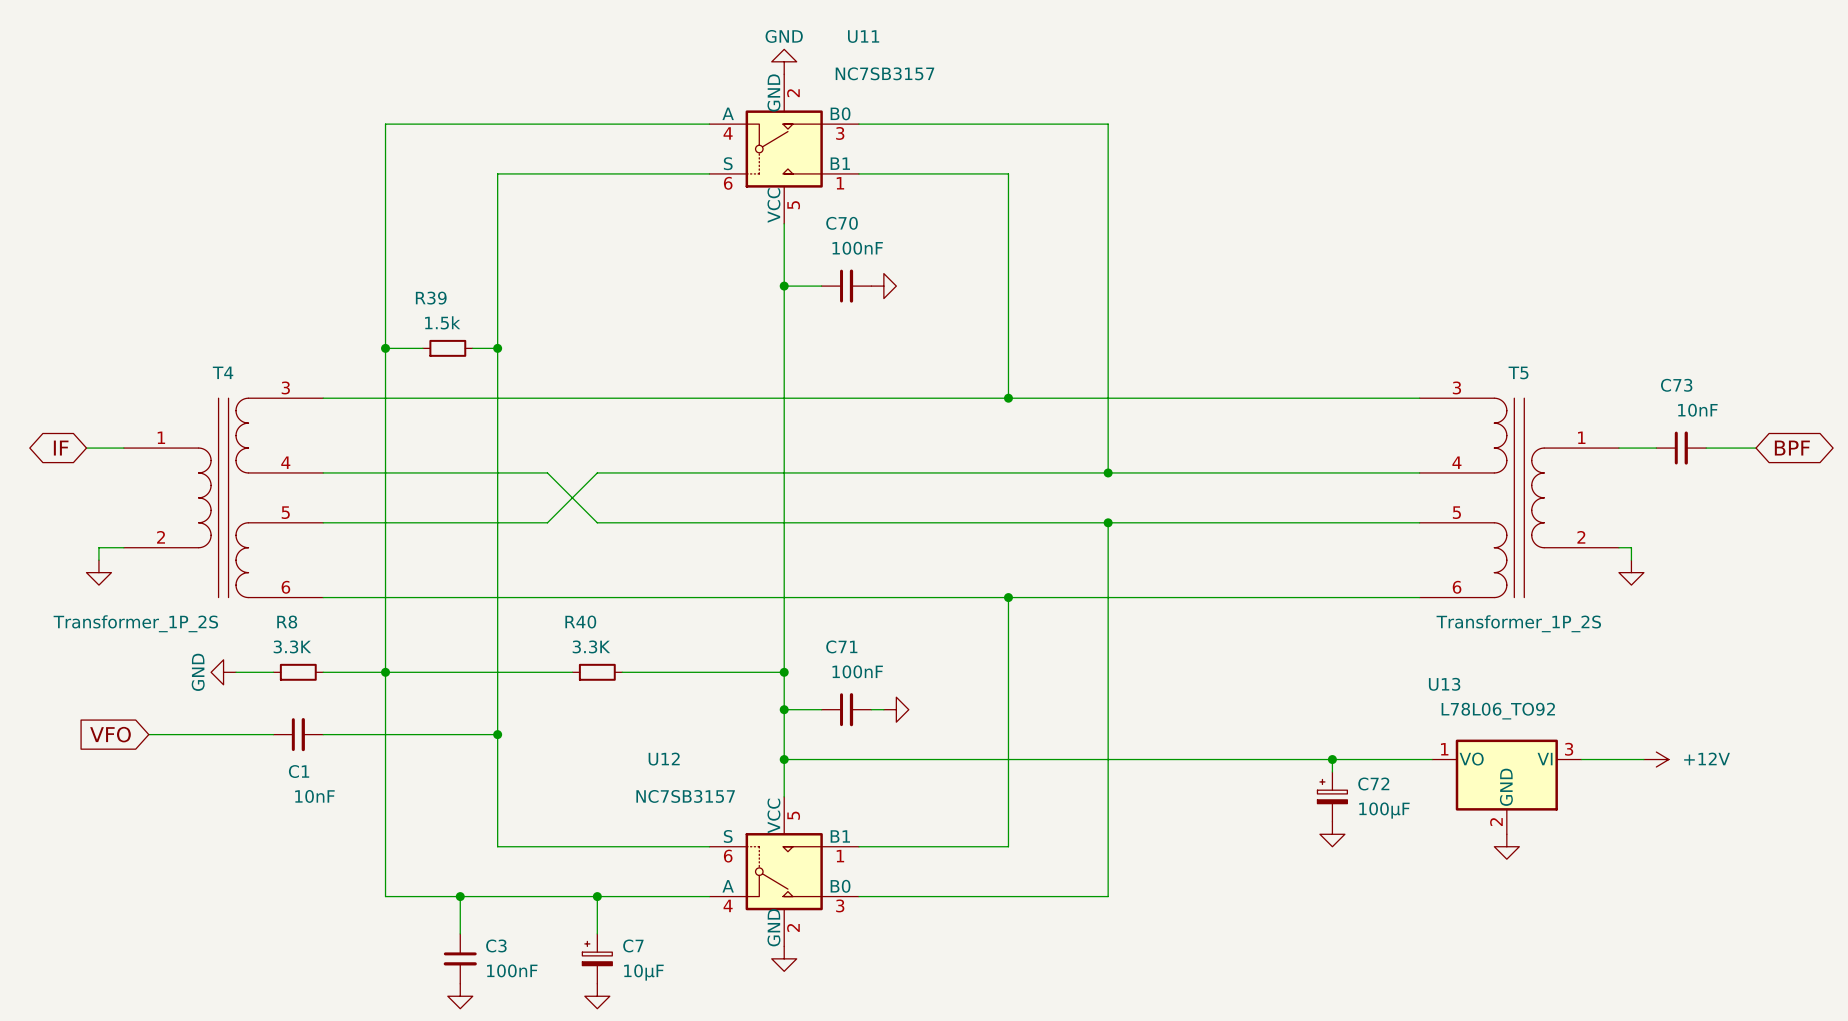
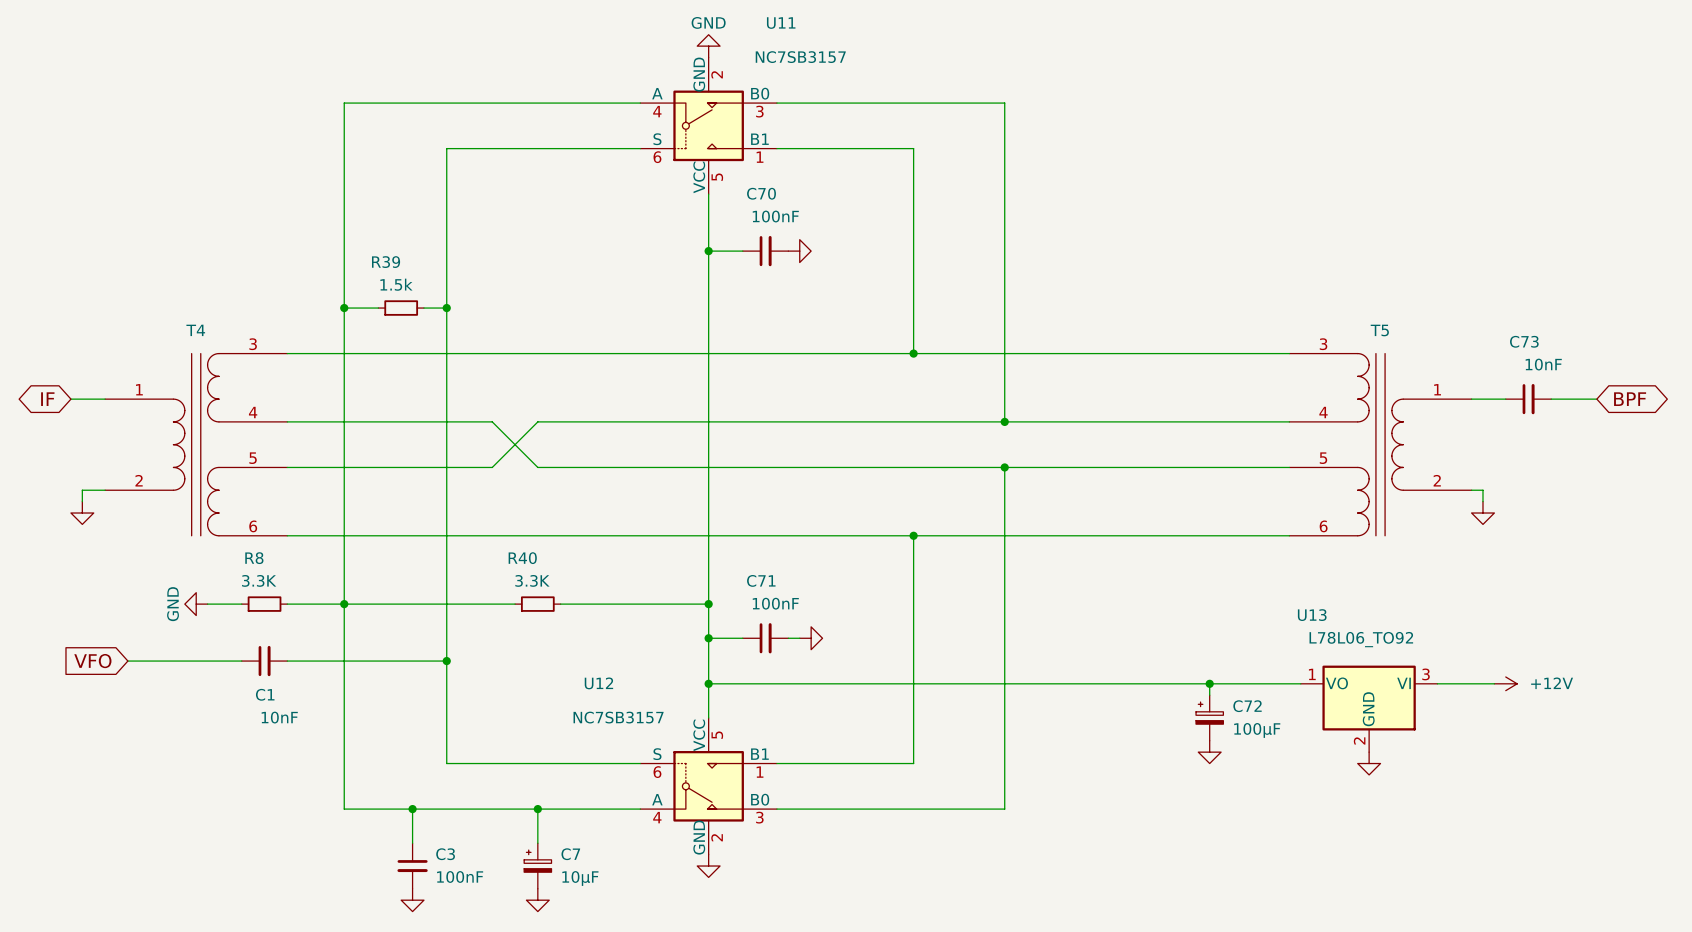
T4 value: Transformer_1P_2S (135, 623) -> none
T5 value: Transformer_1P_2S (1518, 623) -> none

